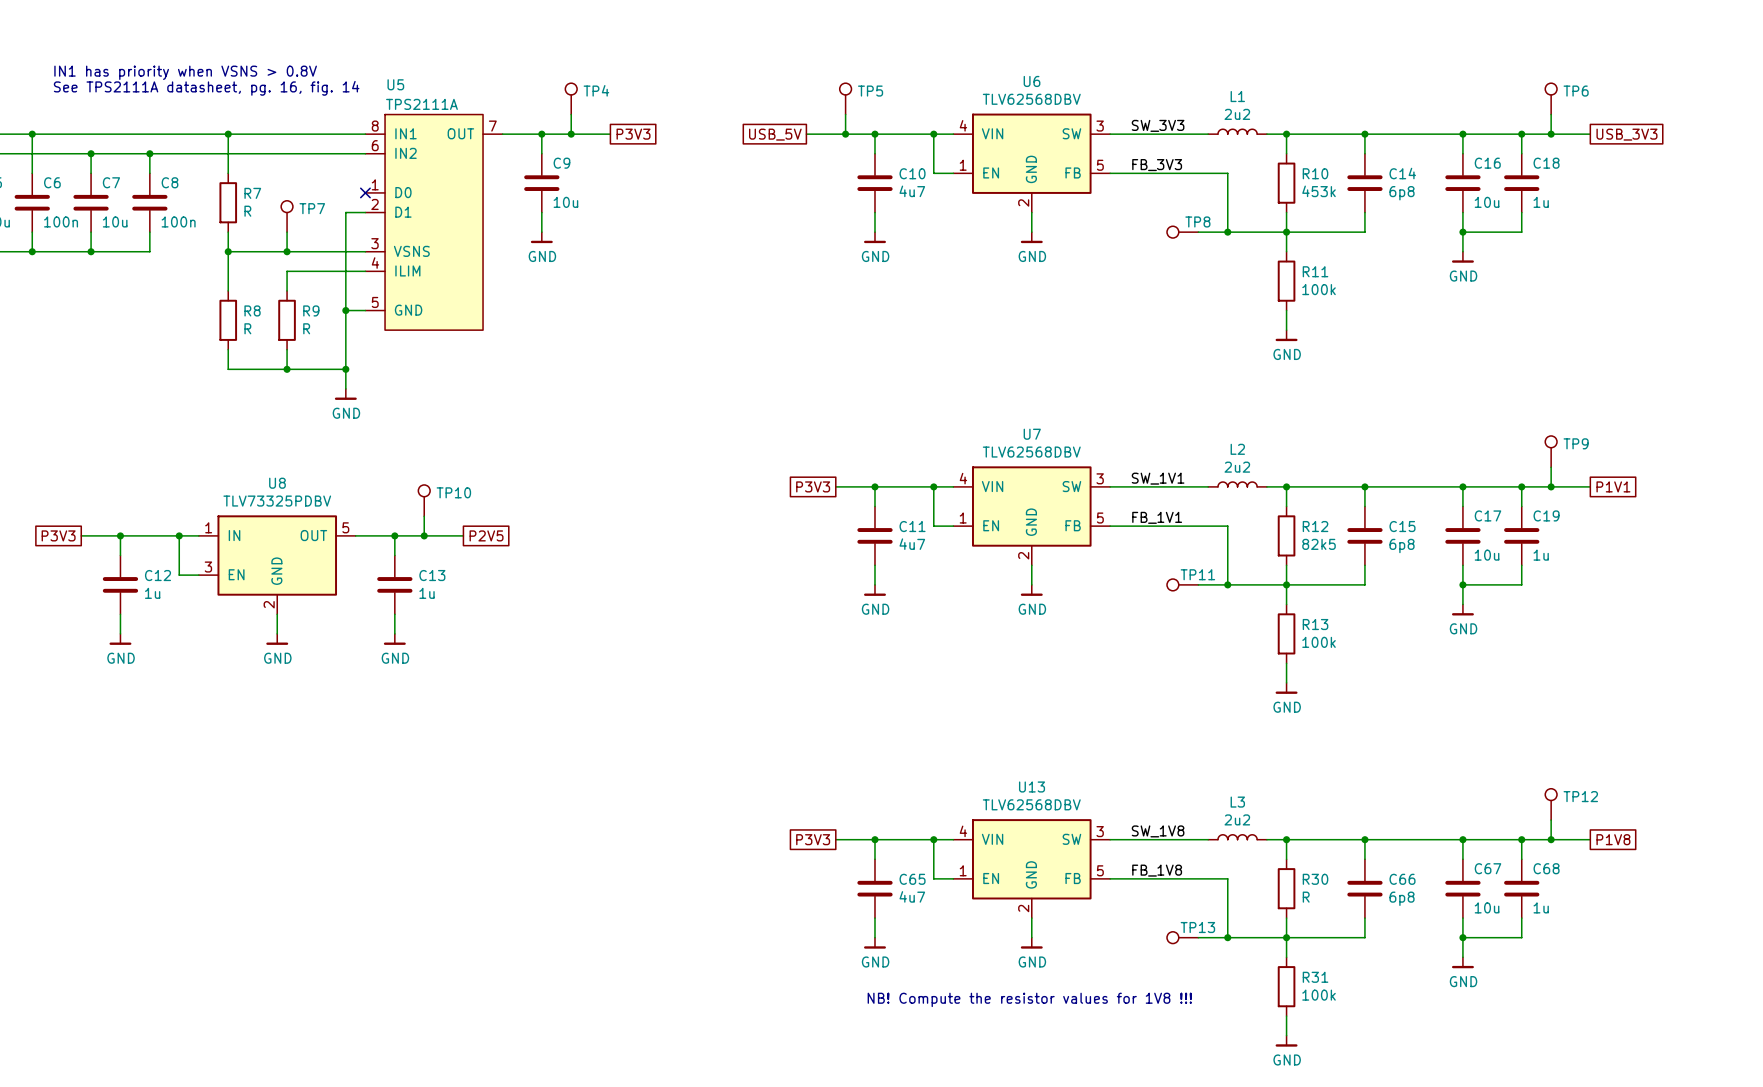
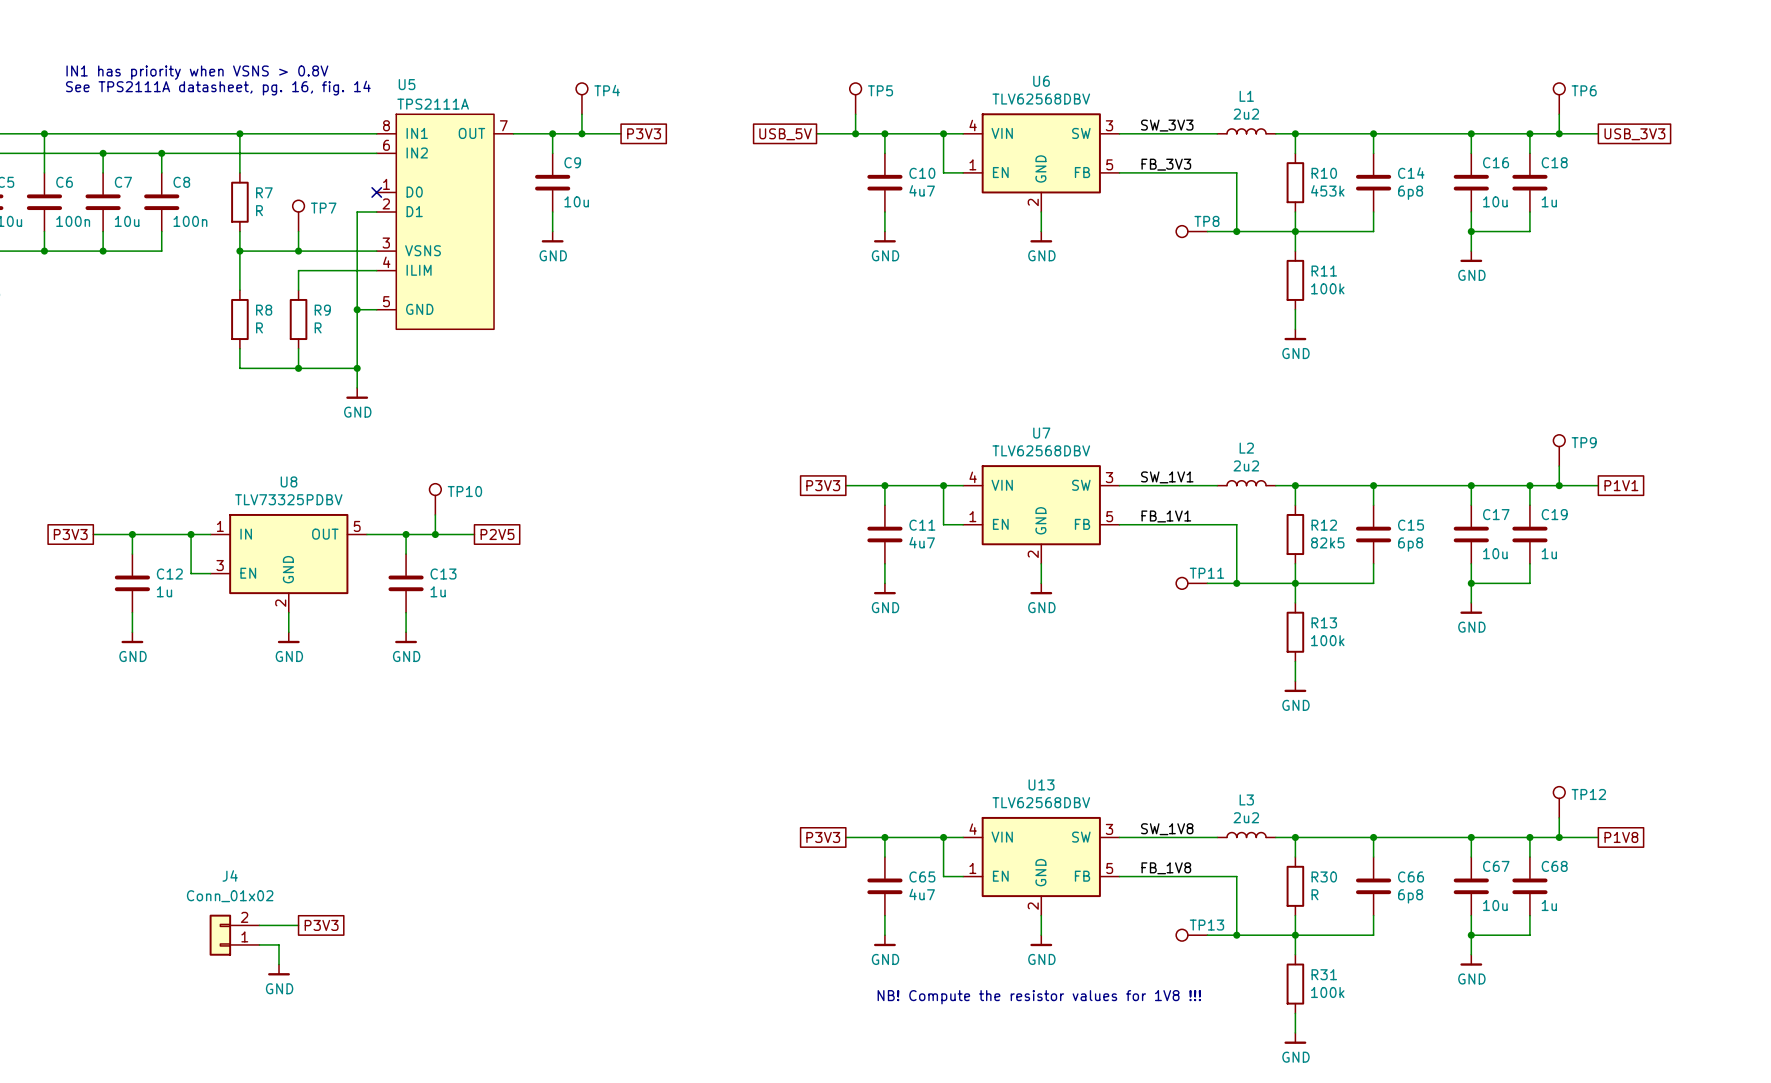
wire: none -> (259, 925) (298, 925)
global label: none -> P3V3 (321, 925)
J4: none -> Conn_01x02 (234, 935)
wire: none -> (259, 944) (279, 944) (279, 964)
power symbol: none -> GND (279, 969)

